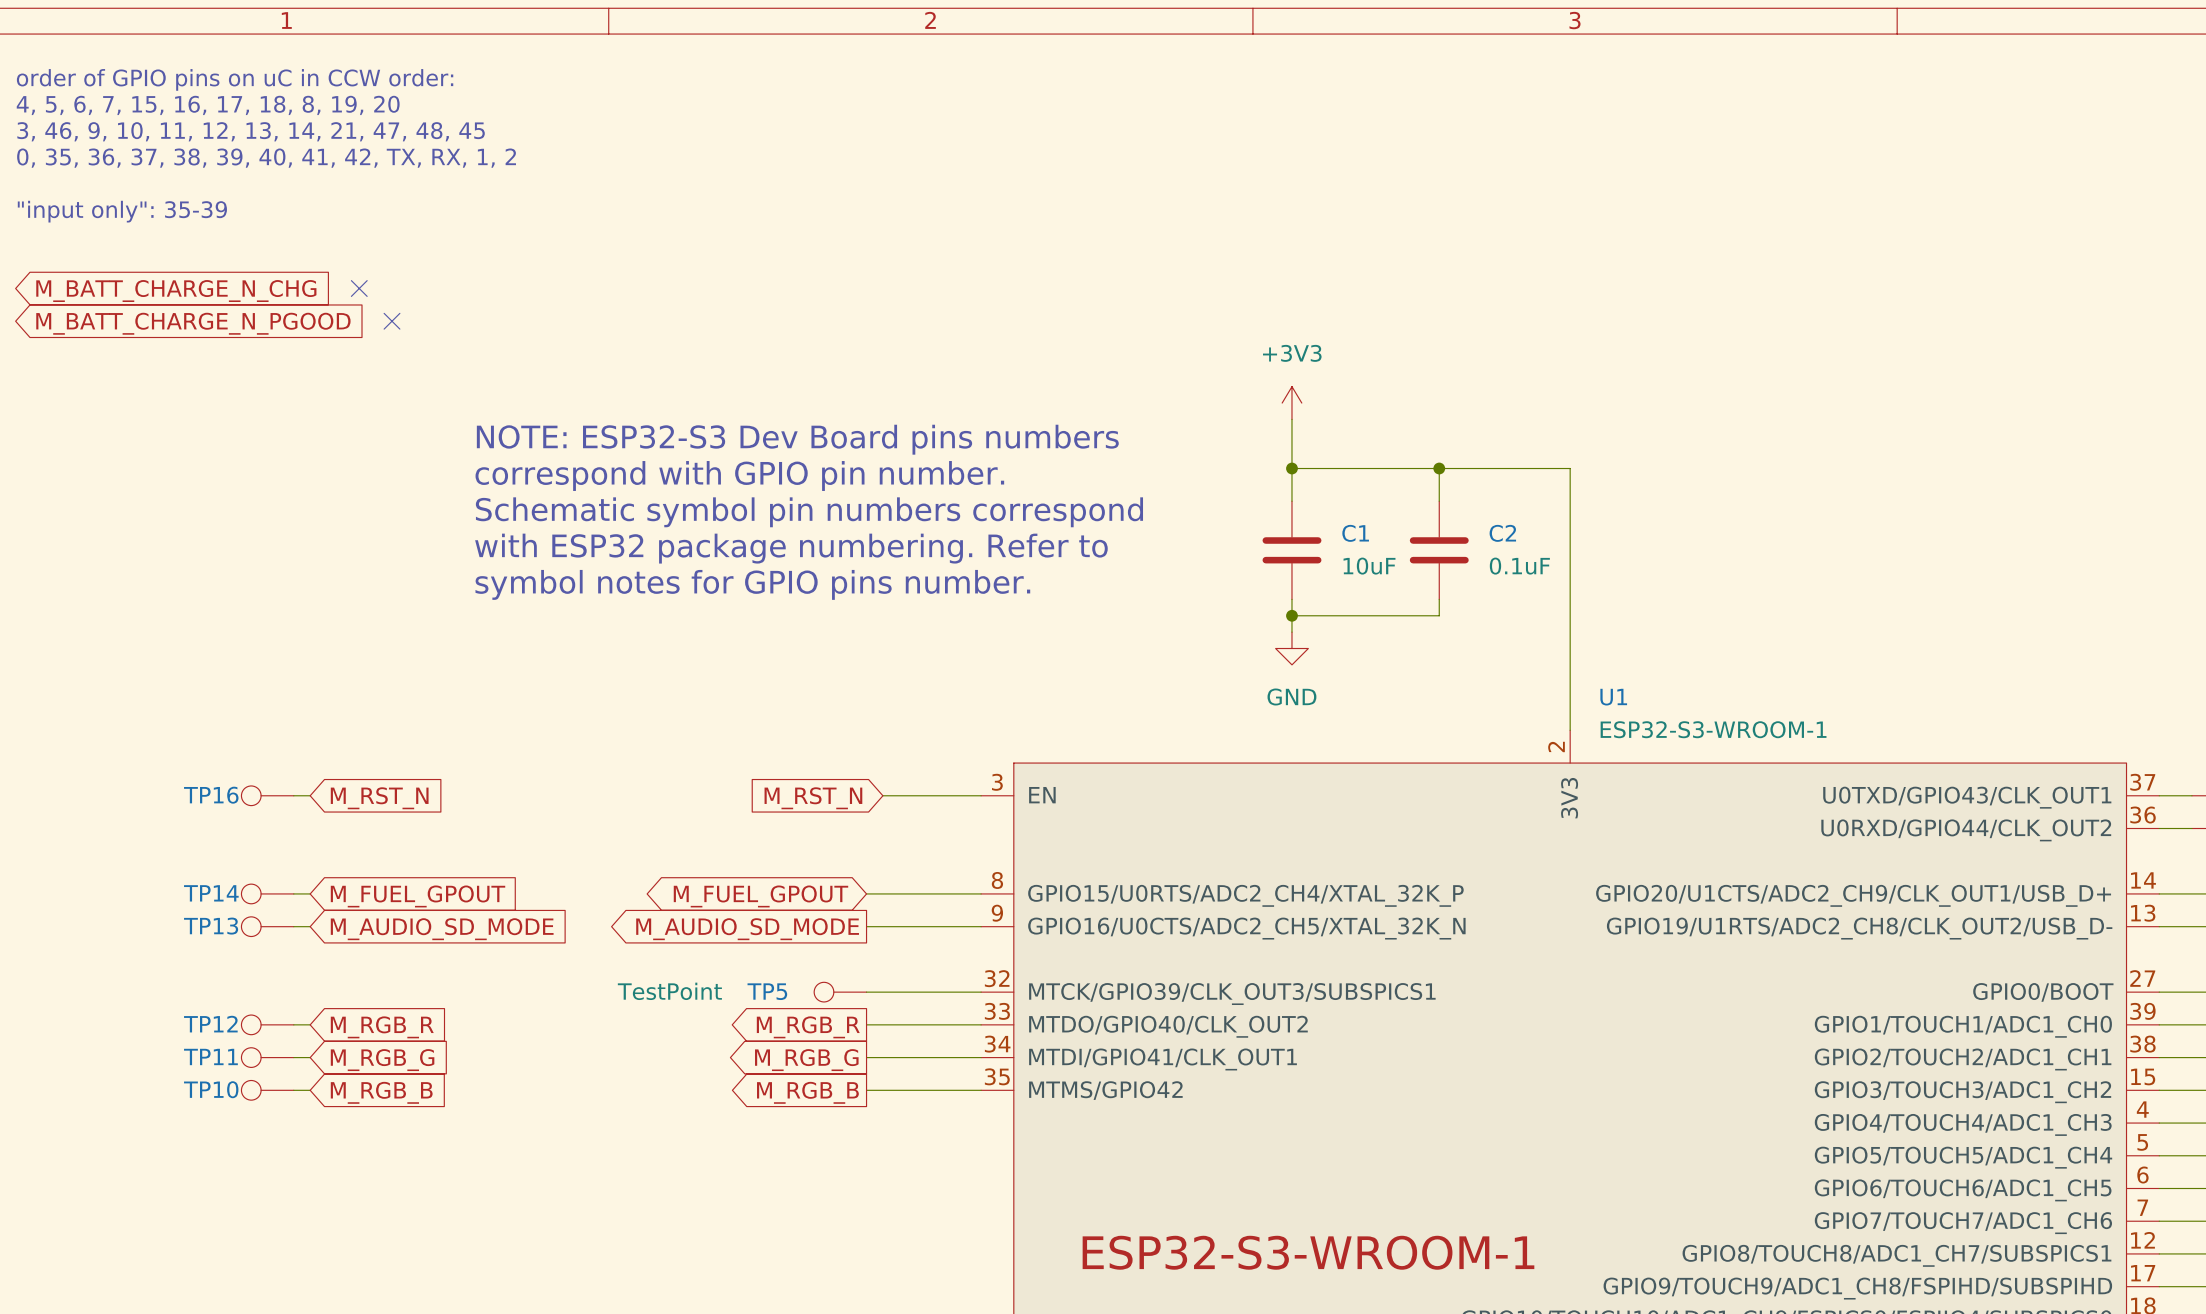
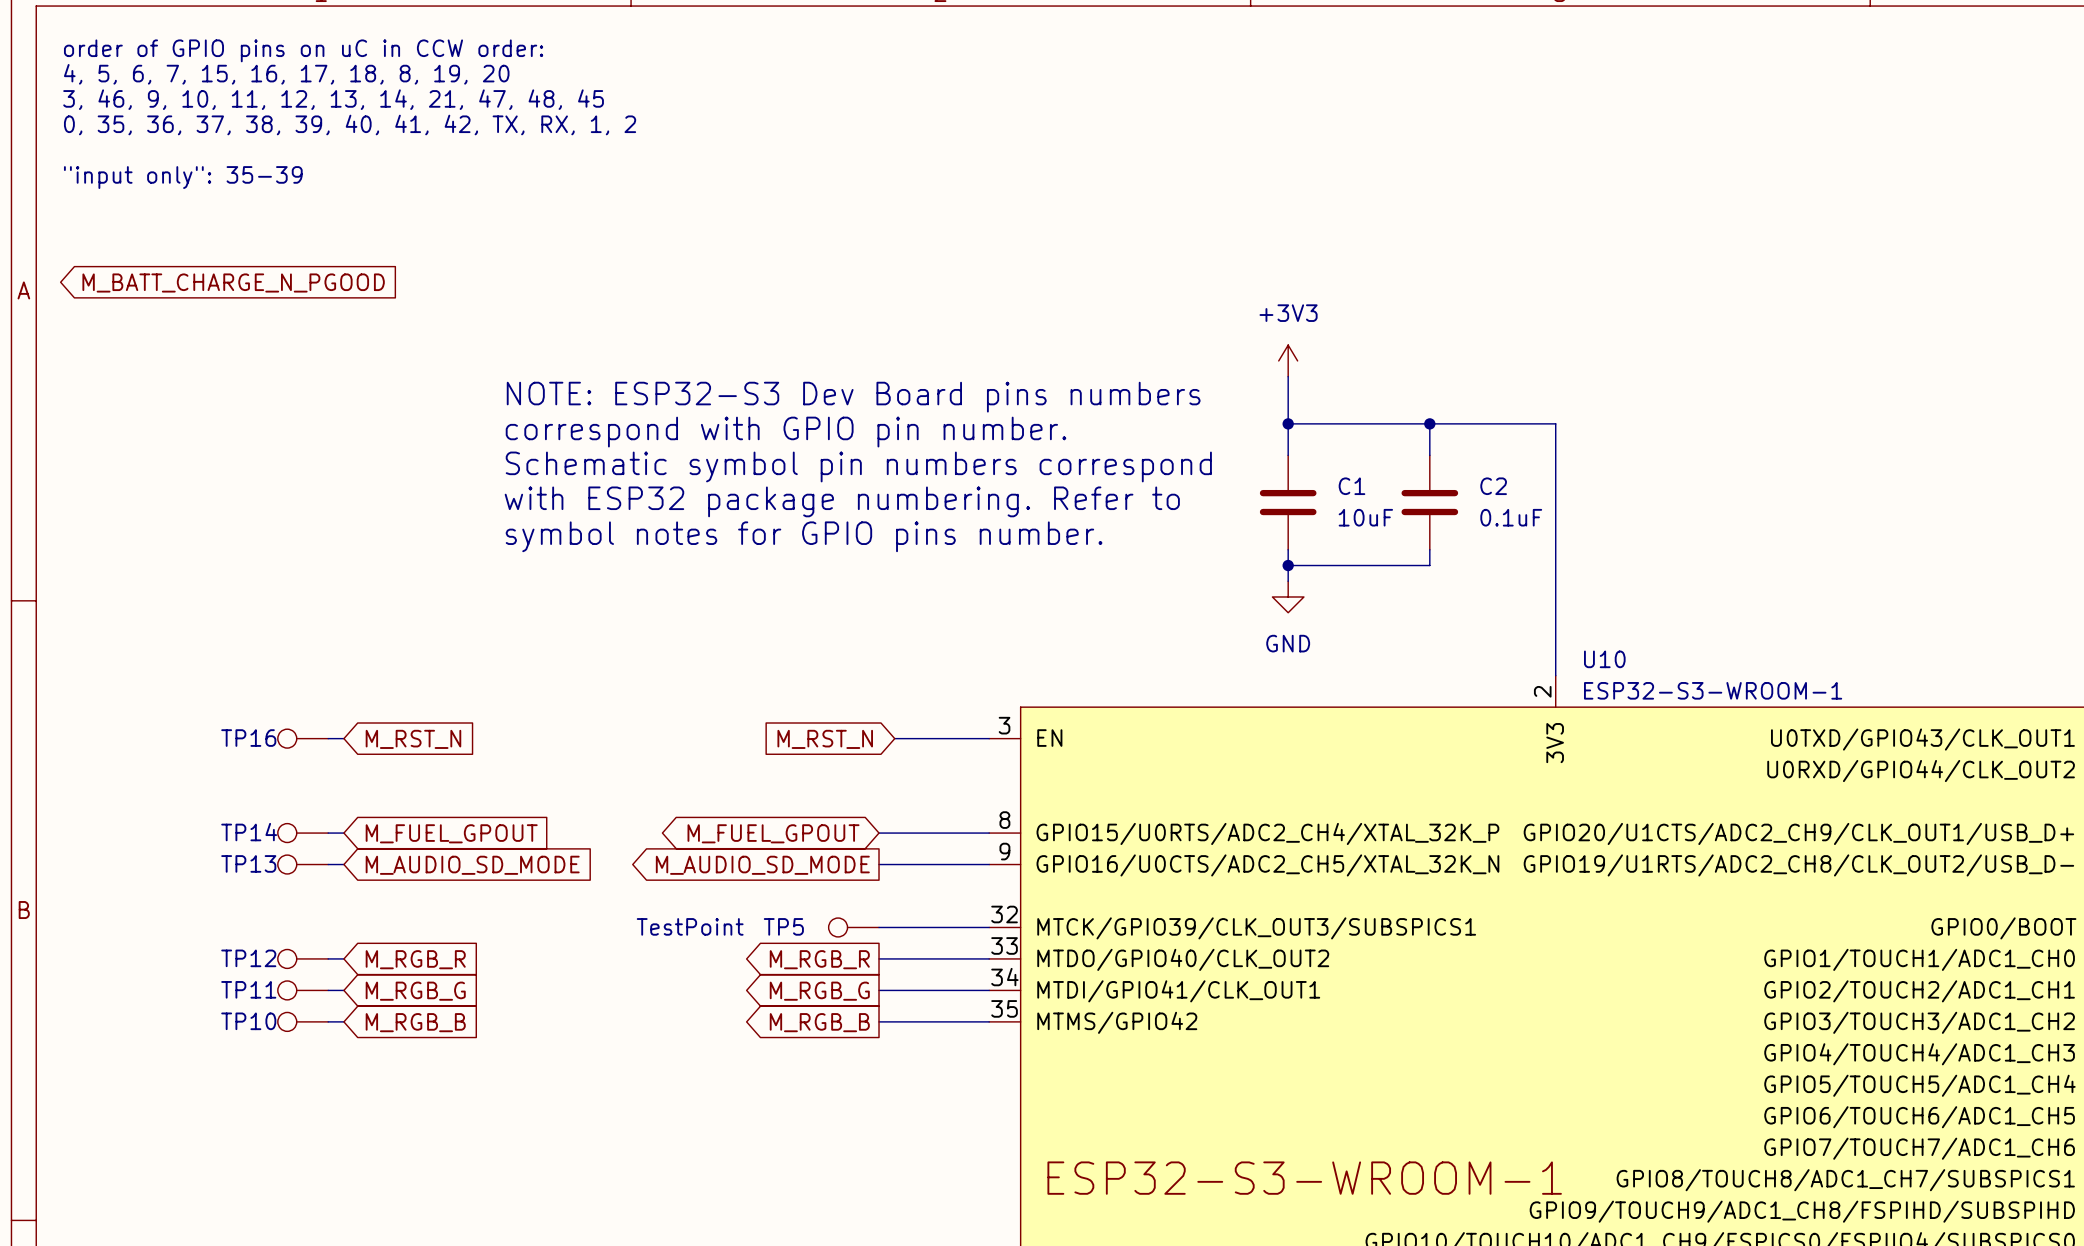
no-connect mark: (359, 288) -> none
global label: M_BATT_CHARGE_N_CHG (176, 291) -> none
no-connect mark: (392, 321) -> none
U1 name: U1 (1613, 697) -> U10 (1604, 659)
U1 value position: ESP32-S3-WROOM-1 (1713, 729) -> ESP32-S3-WROOM-1 (1713, 690)

